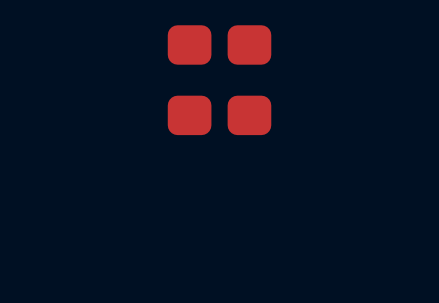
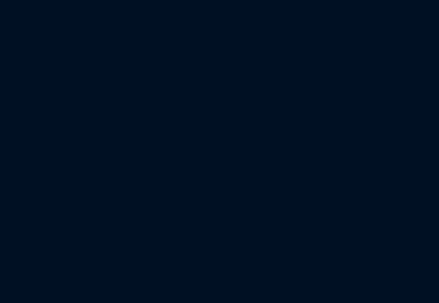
part: (189, 80) -> none
part: (249, 80) -> none

